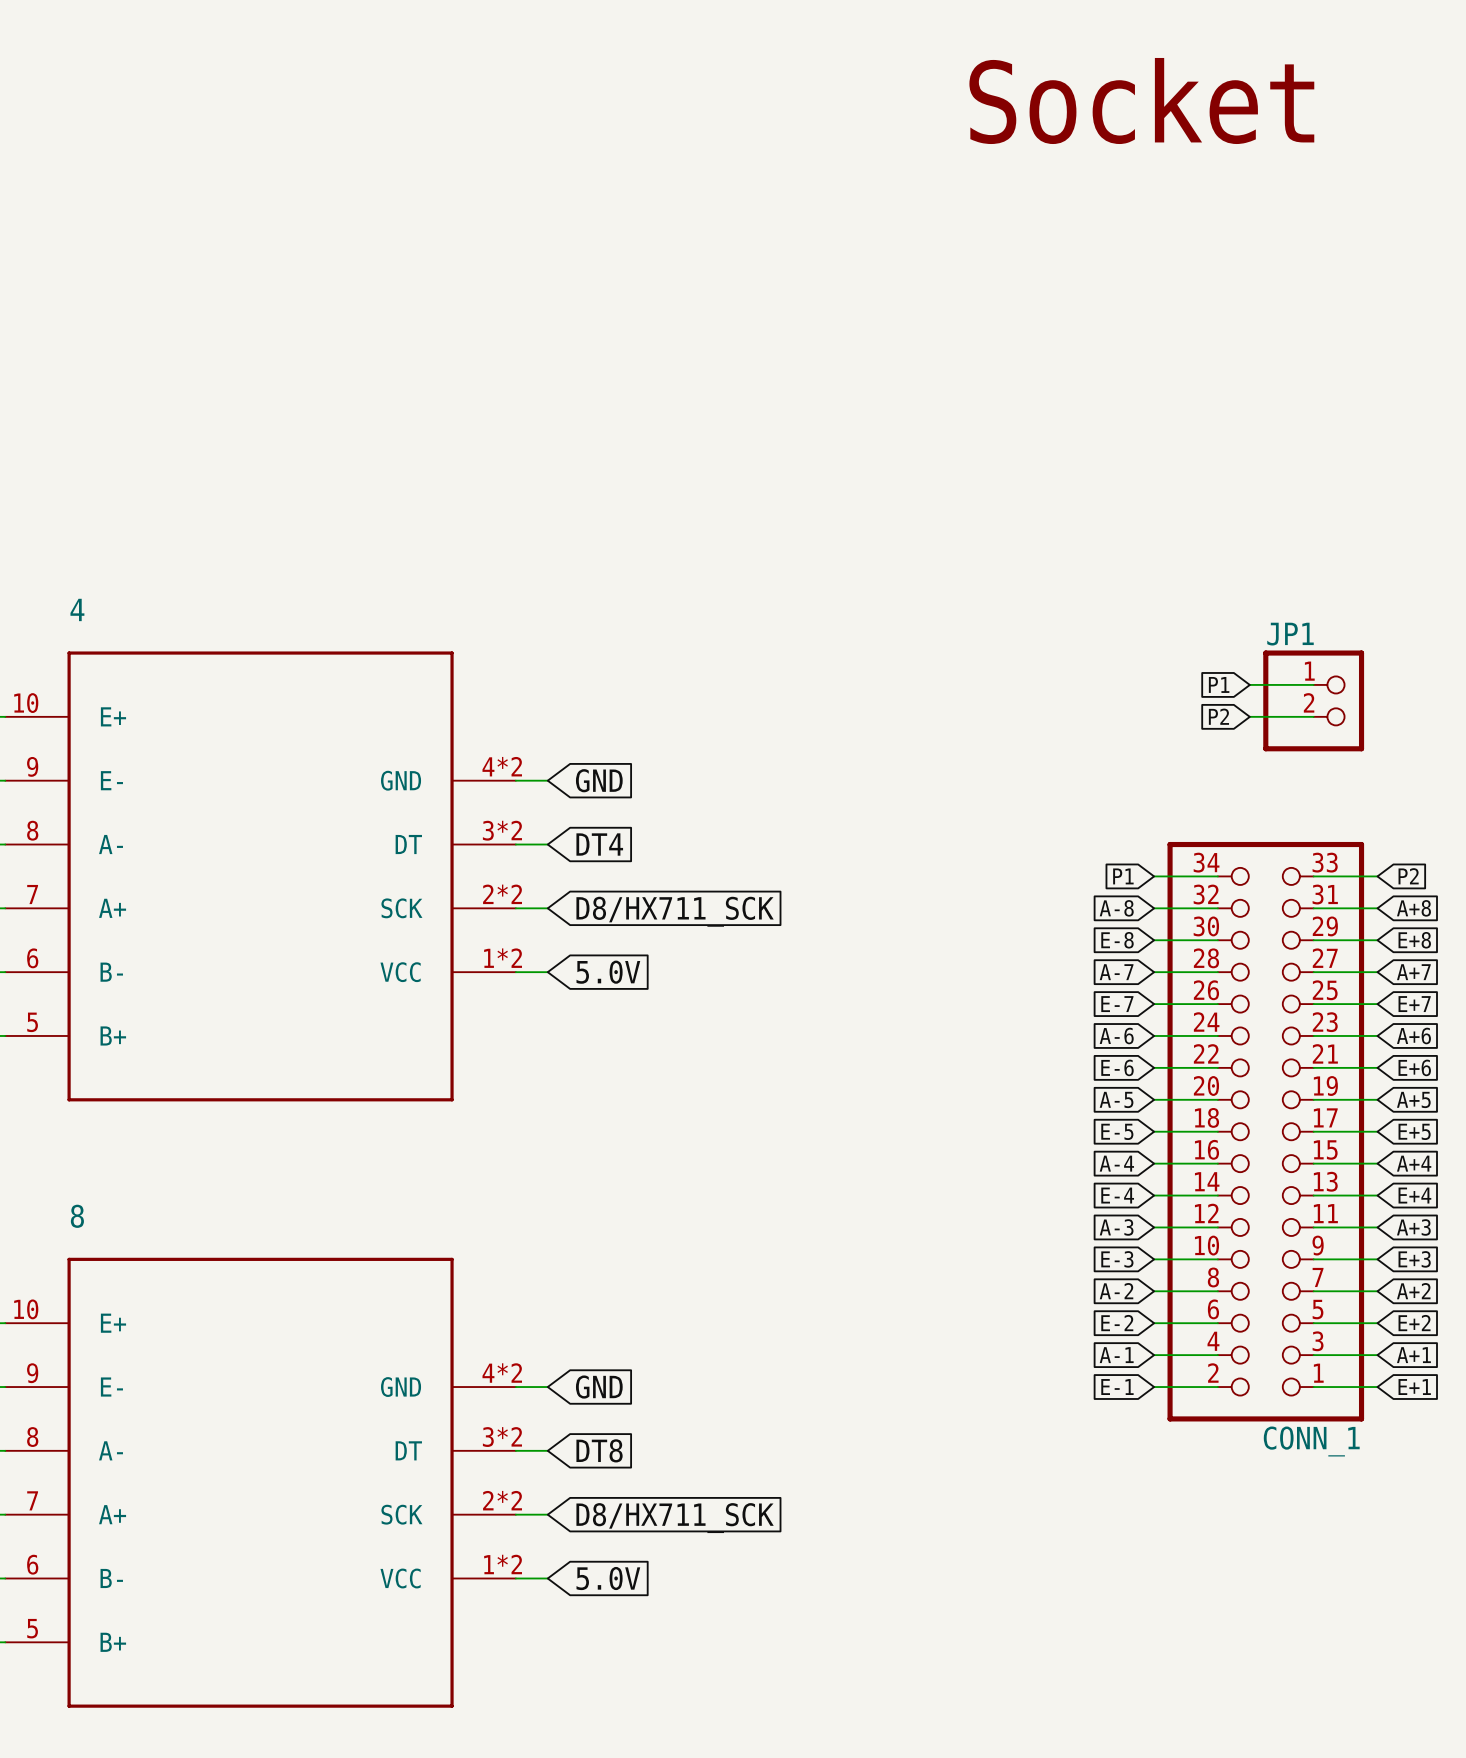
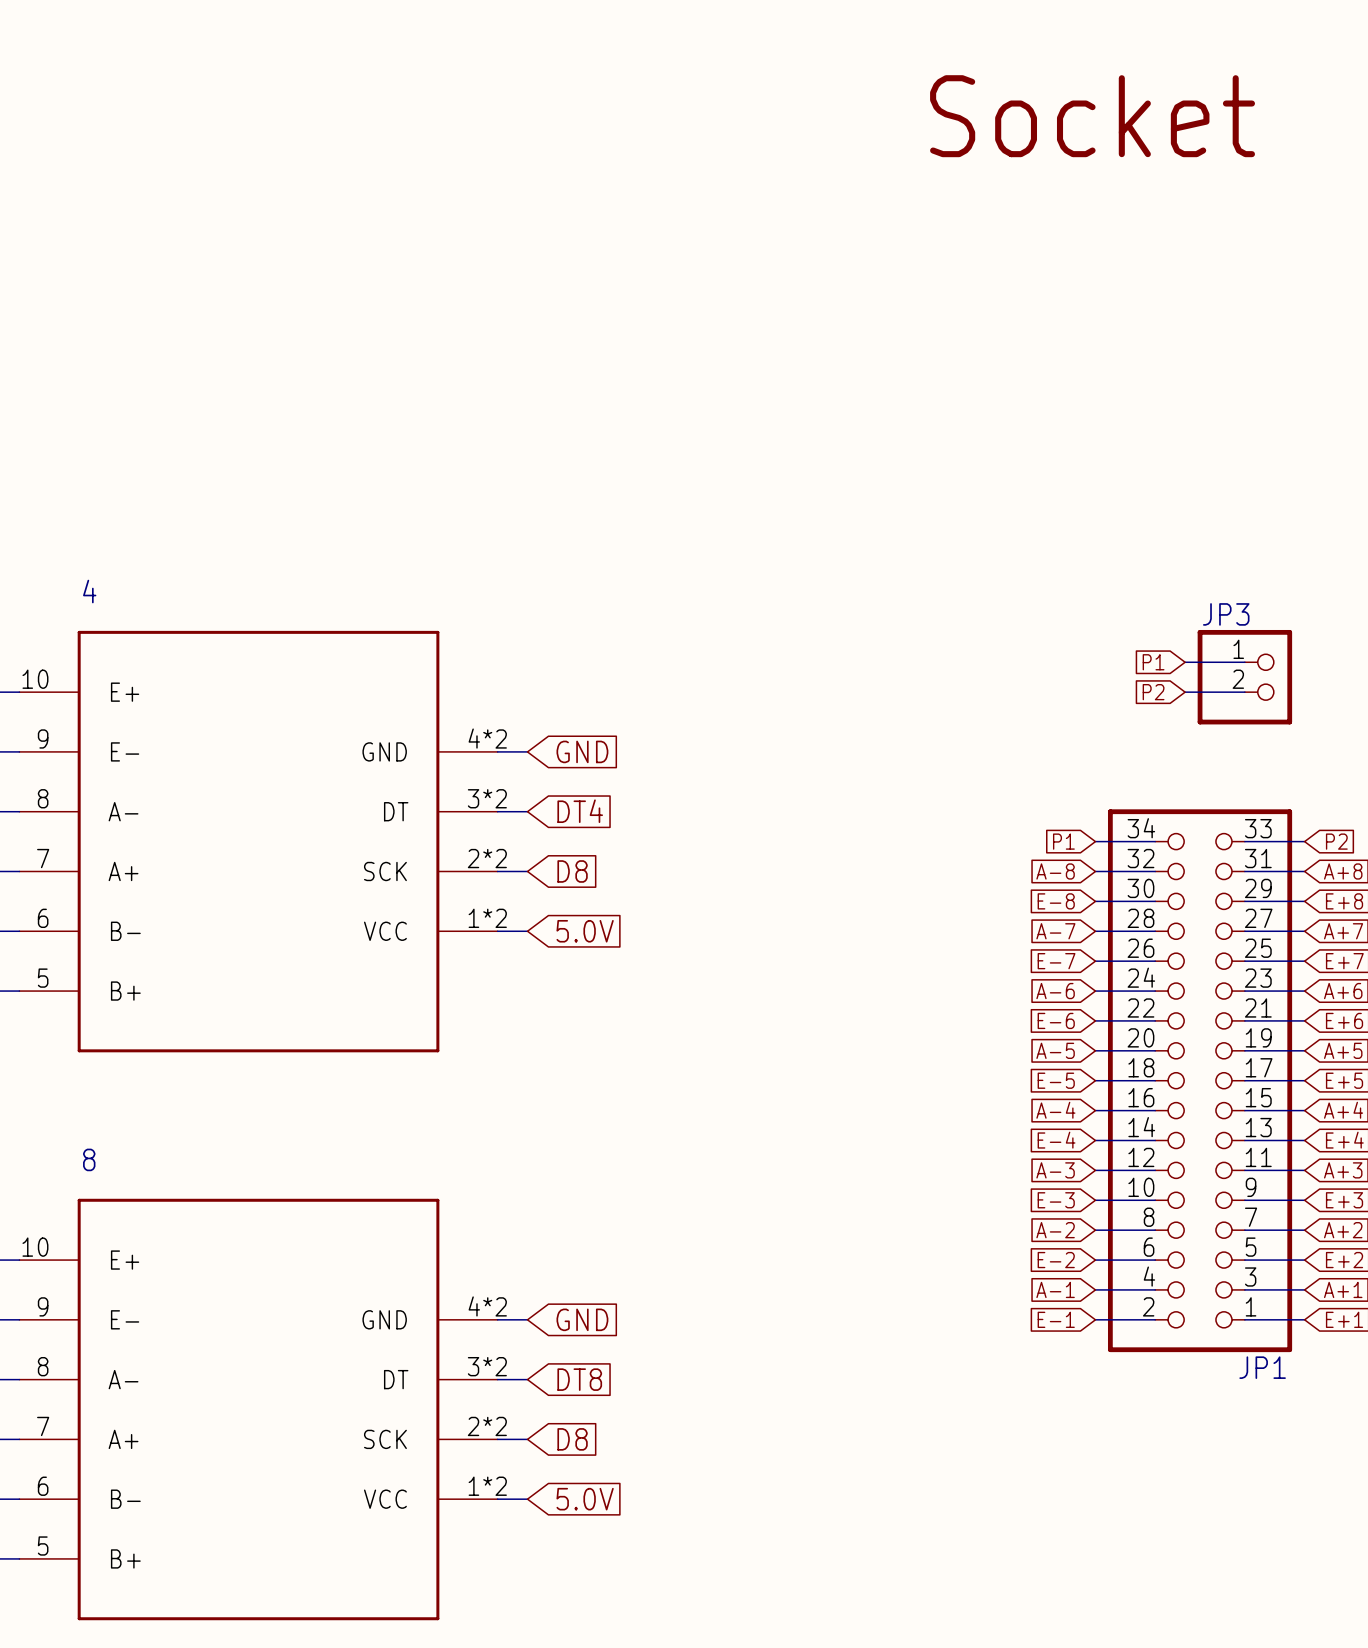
JP1 name: JP1 (1290, 634) -> JP3 (1226, 614)
global label: D8/HX711_SCK (675, 911) -> D8 (572, 871)
CONN_1 name: CONN_1 (1311, 1441) -> JP1 (1262, 1367)
global label: D8/HX711_SCK (675, 1518) -> D8 (572, 1439)

